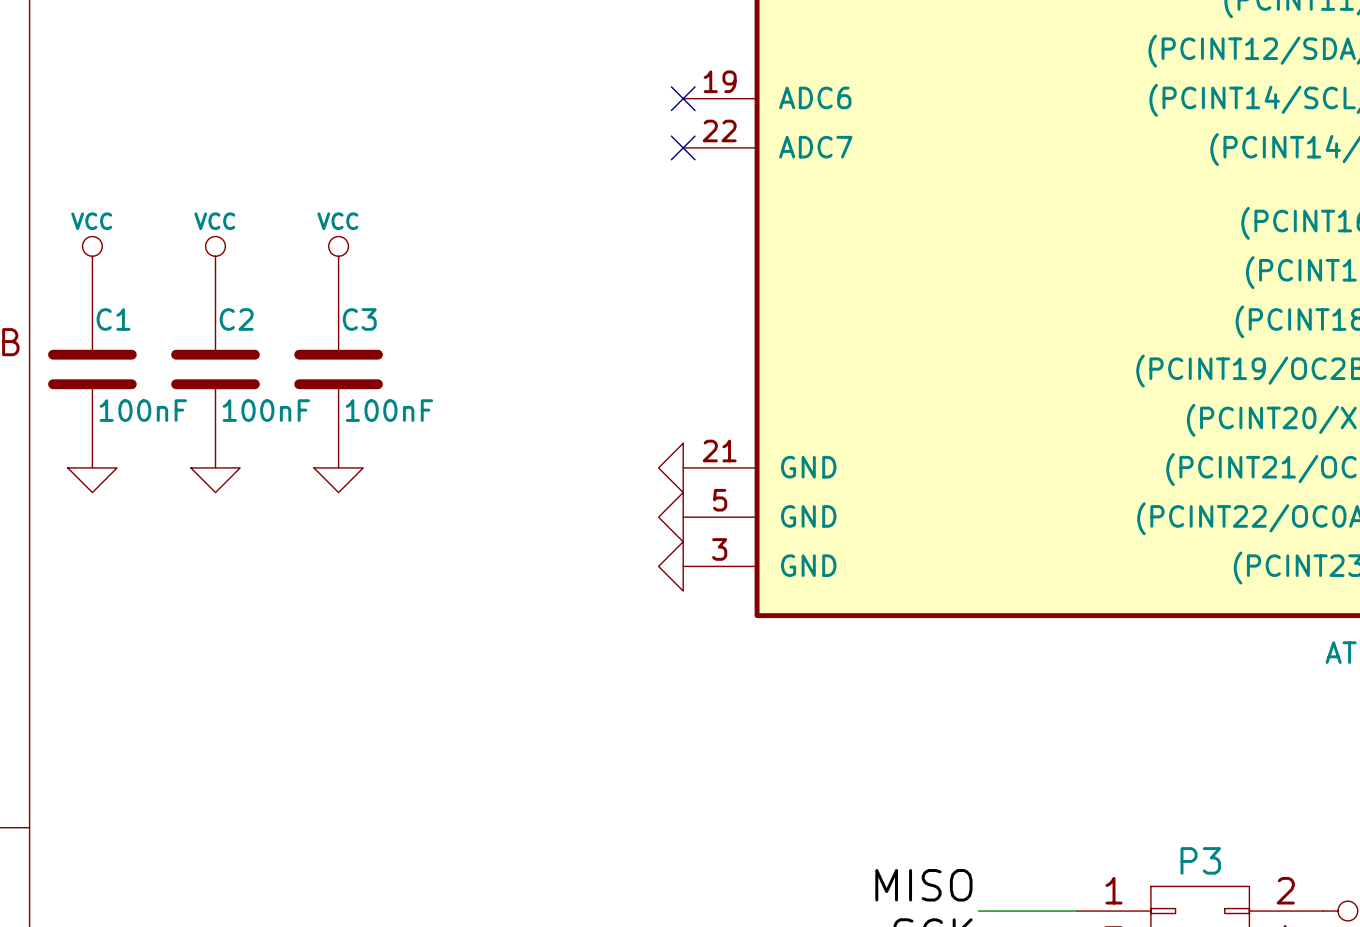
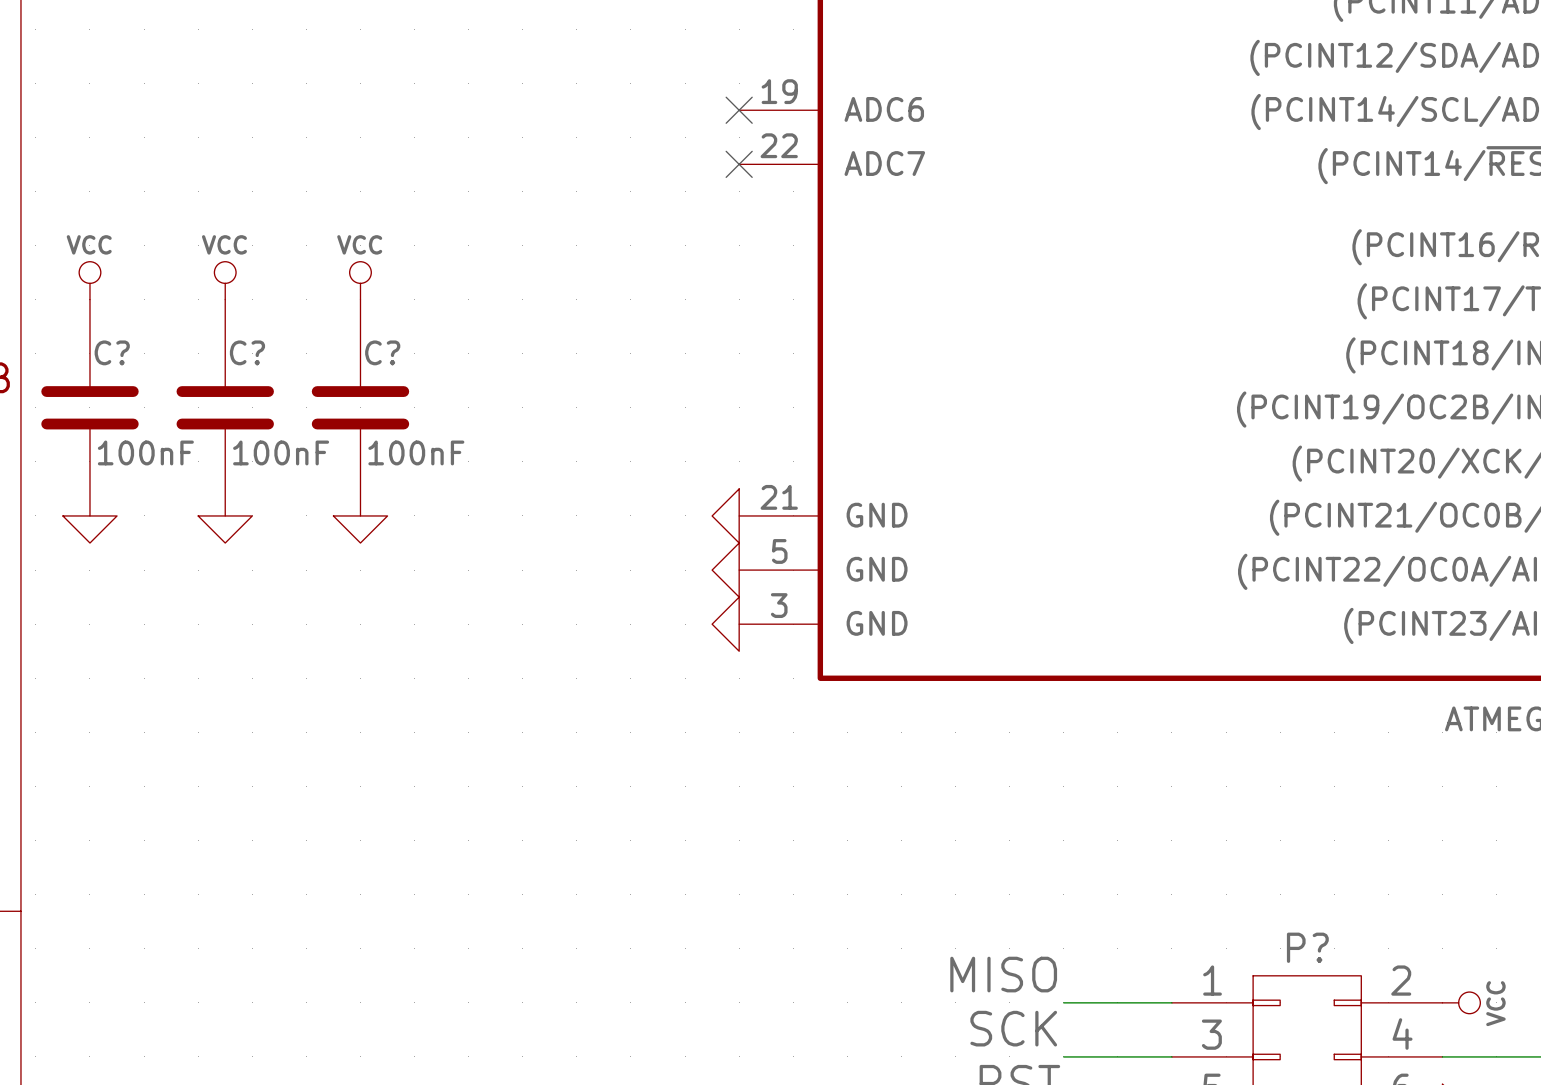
C1 name: C1 (113, 319) -> C? (112, 352)
C2 name: C2 (236, 319) -> C? (247, 352)
C3 name: C3 (359, 319) -> C? (382, 352)
P3 name: P3 (1200, 860) -> P? (1307, 947)

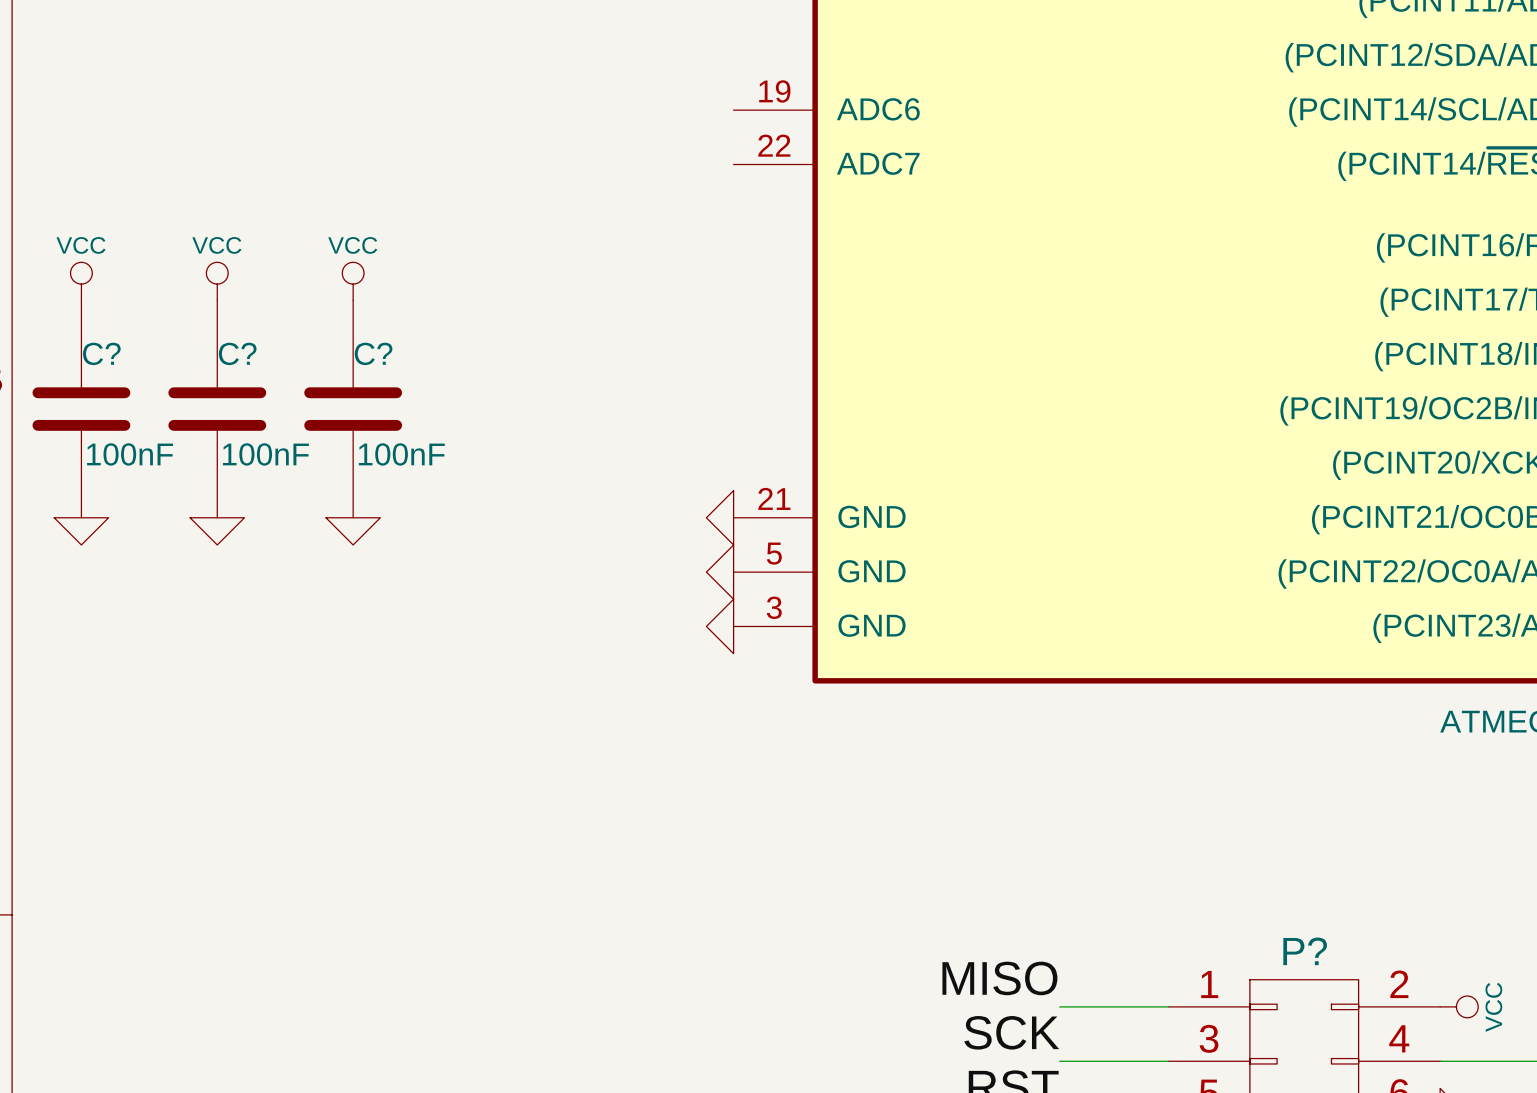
no-connect mark: (739, 110) -> none
no-connect mark: (739, 164) -> none

